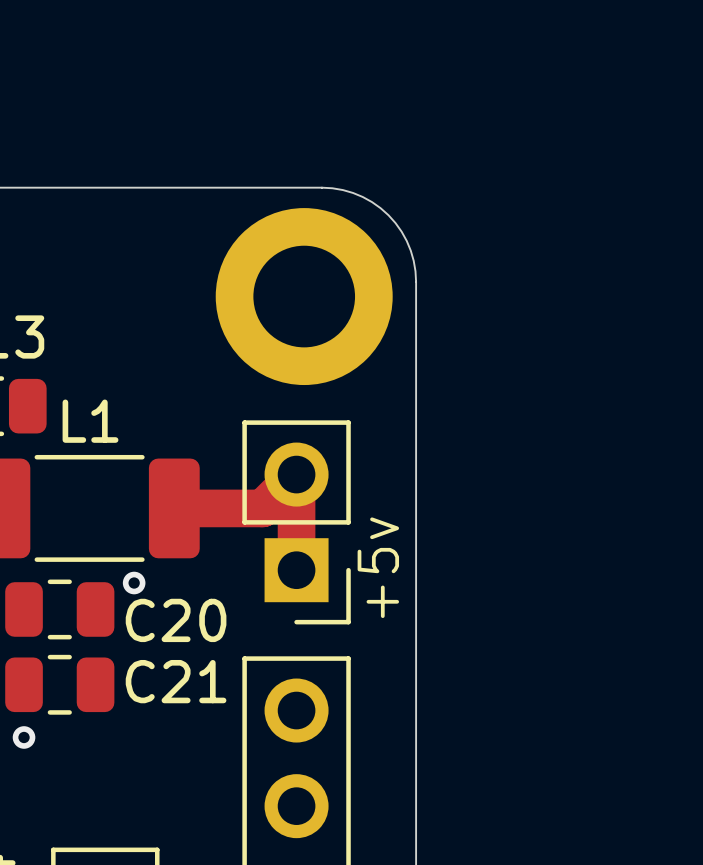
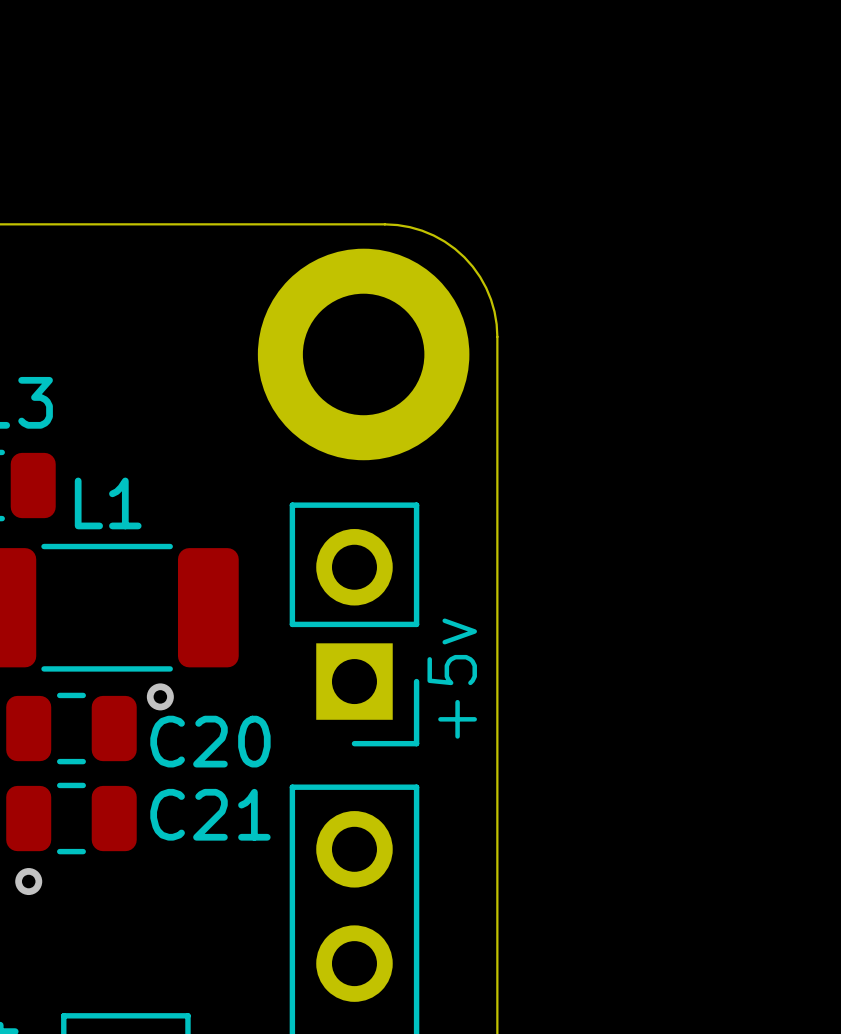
track: (174, 508) (262, 508) (296, 474) (296, 570) -> none

